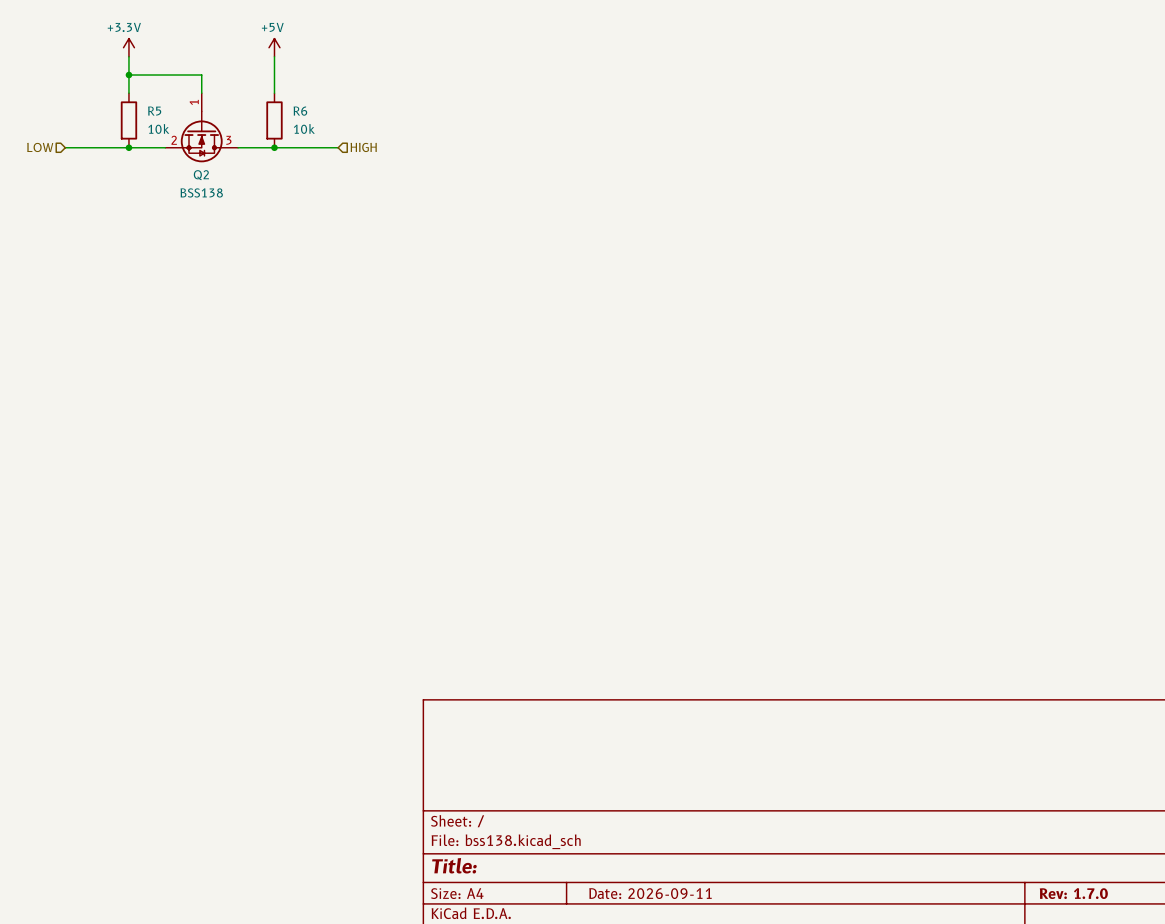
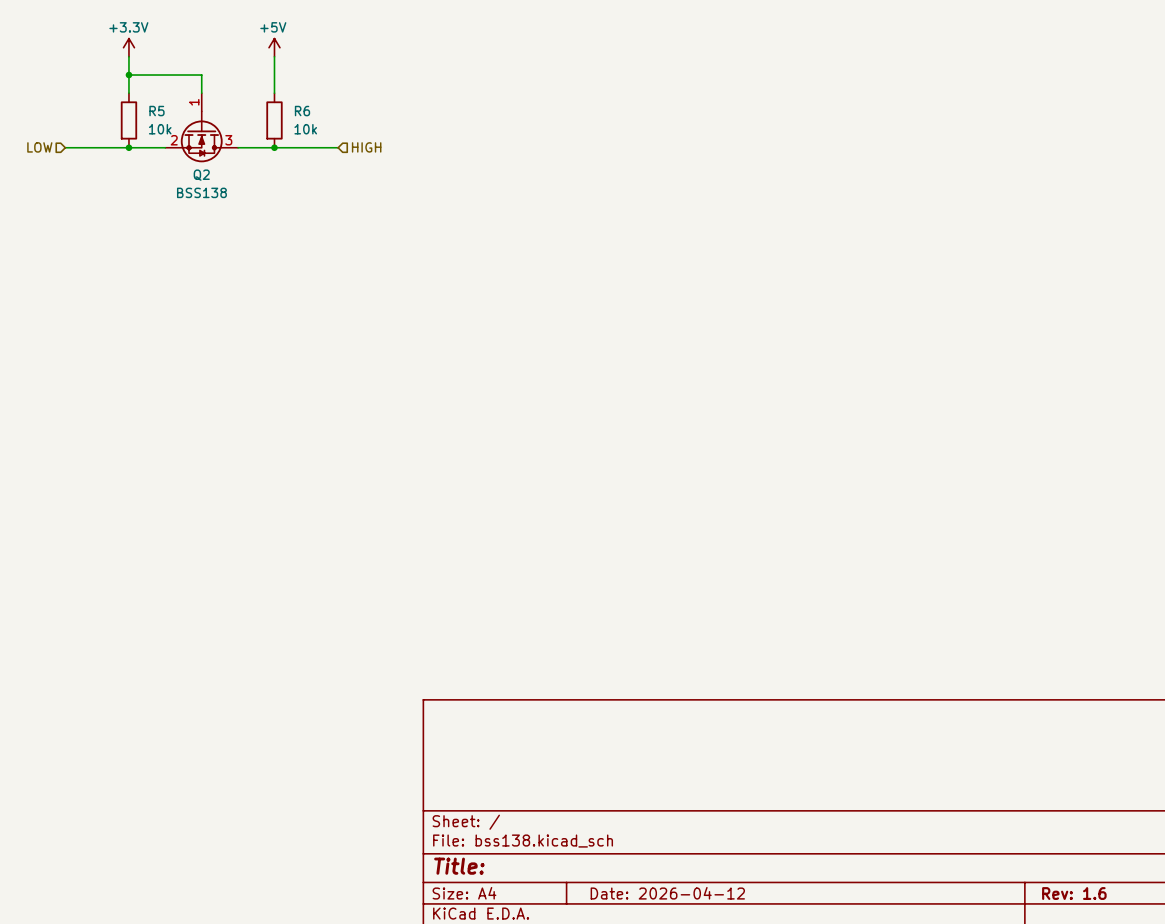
title block: Date: 2026-09-11 (650, 893) -> Date: 2026-04-12 (667, 893)
title block: Rev: 1.7.0 (1073, 893) -> Rev: 1.6 (1074, 893)

